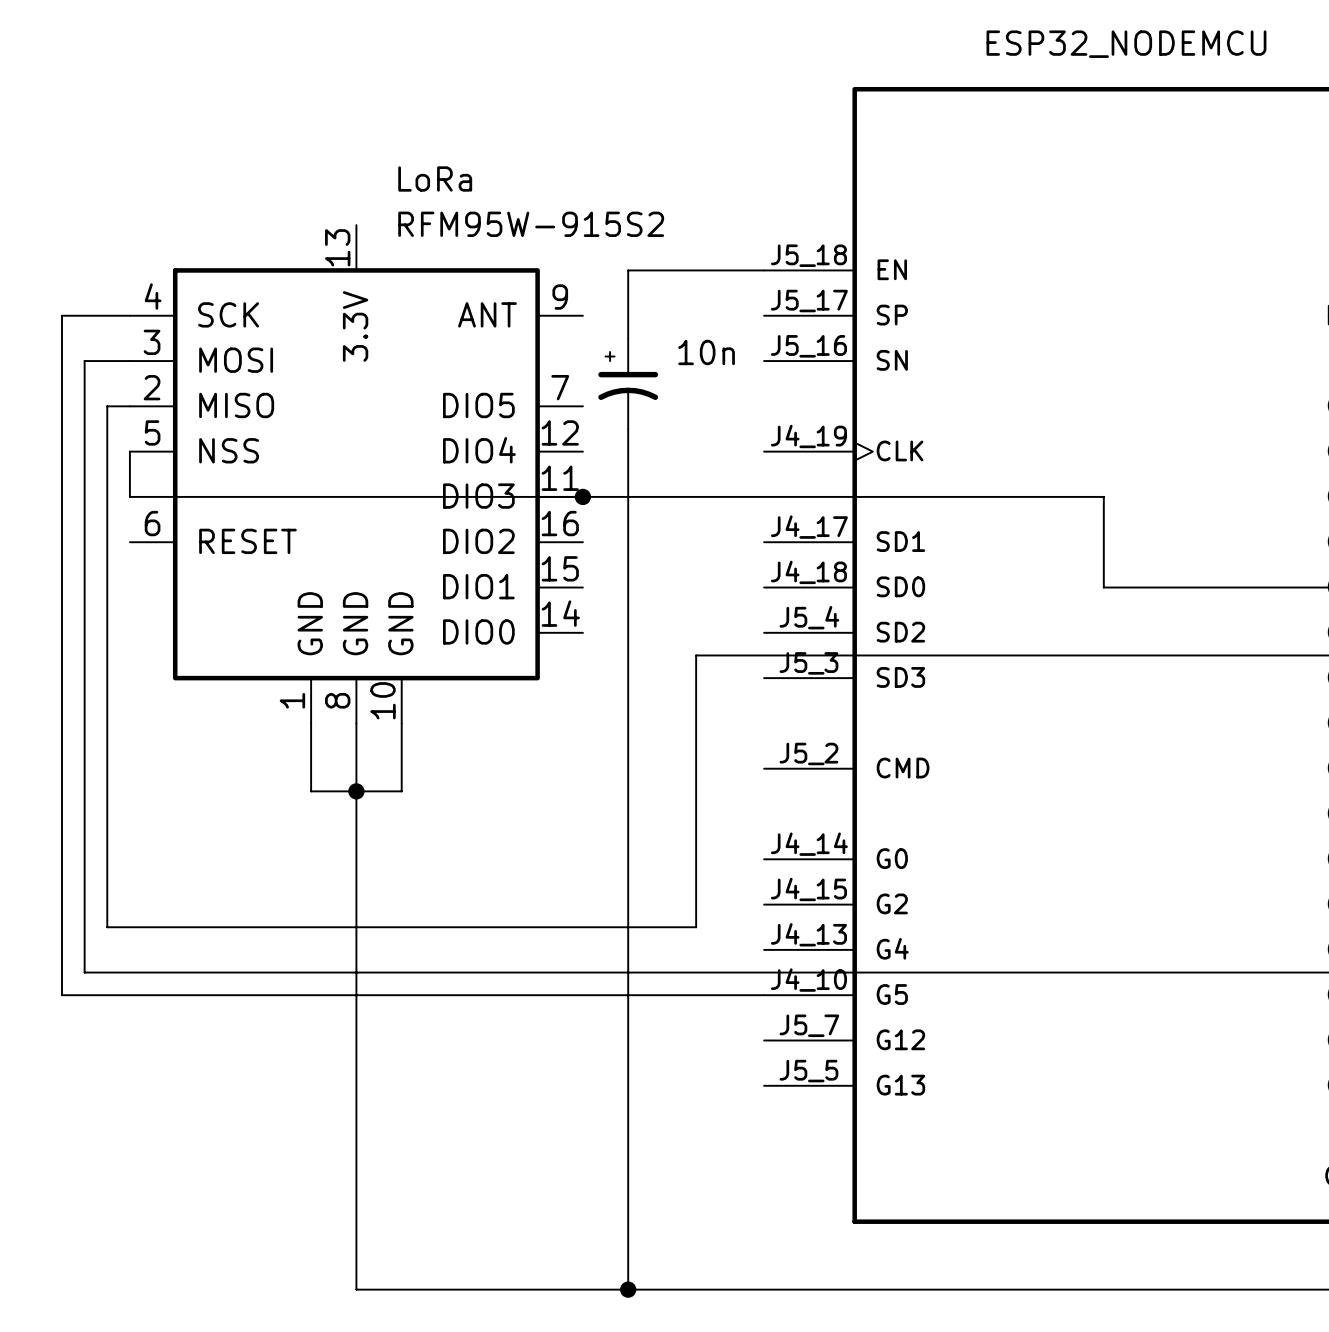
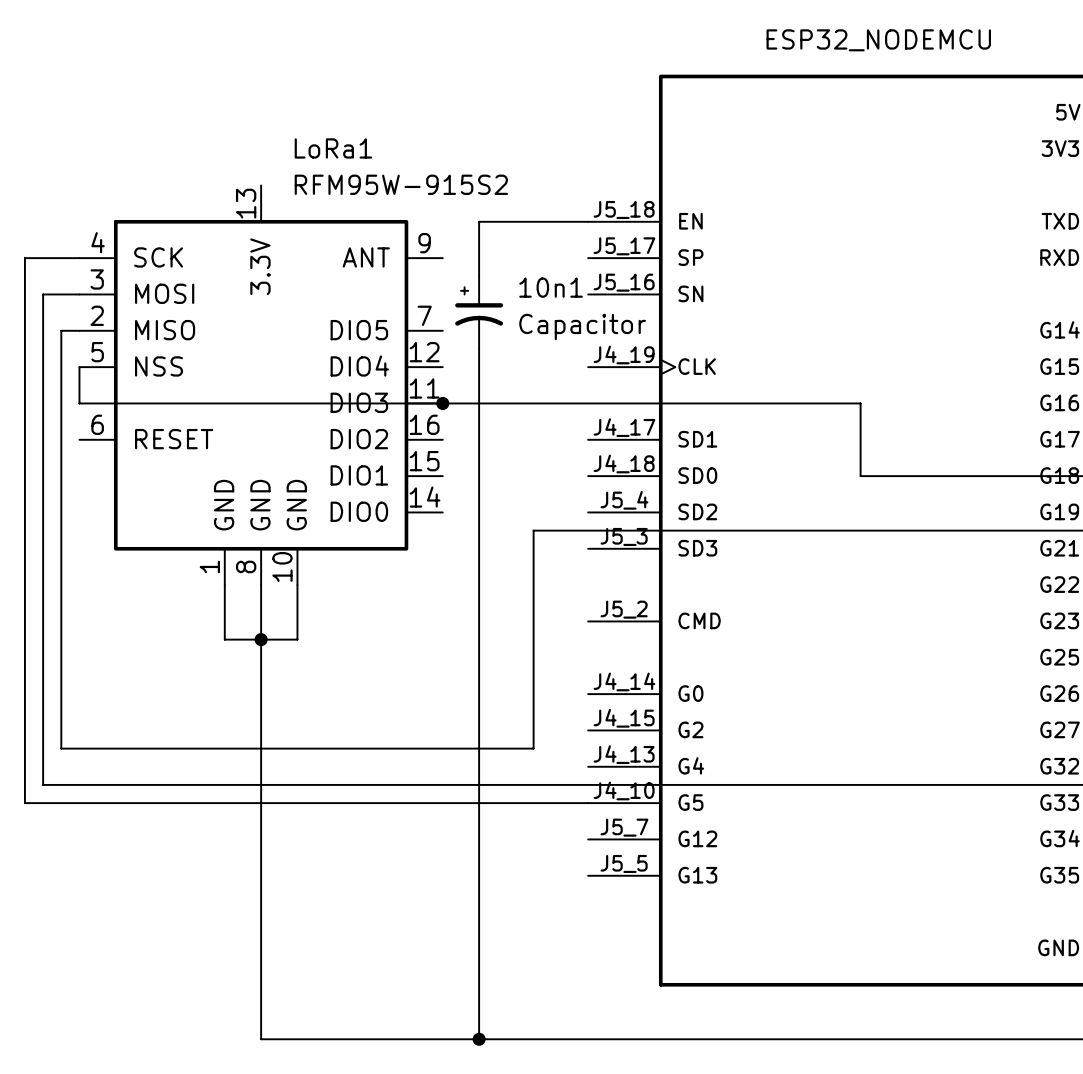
LoRa name: LoRa (435, 179) -> LoRa1 (333, 148)
10n name: 10n (706, 352) -> 10n1 (551, 287)
10n value: none -> Capacitor (582, 326)

